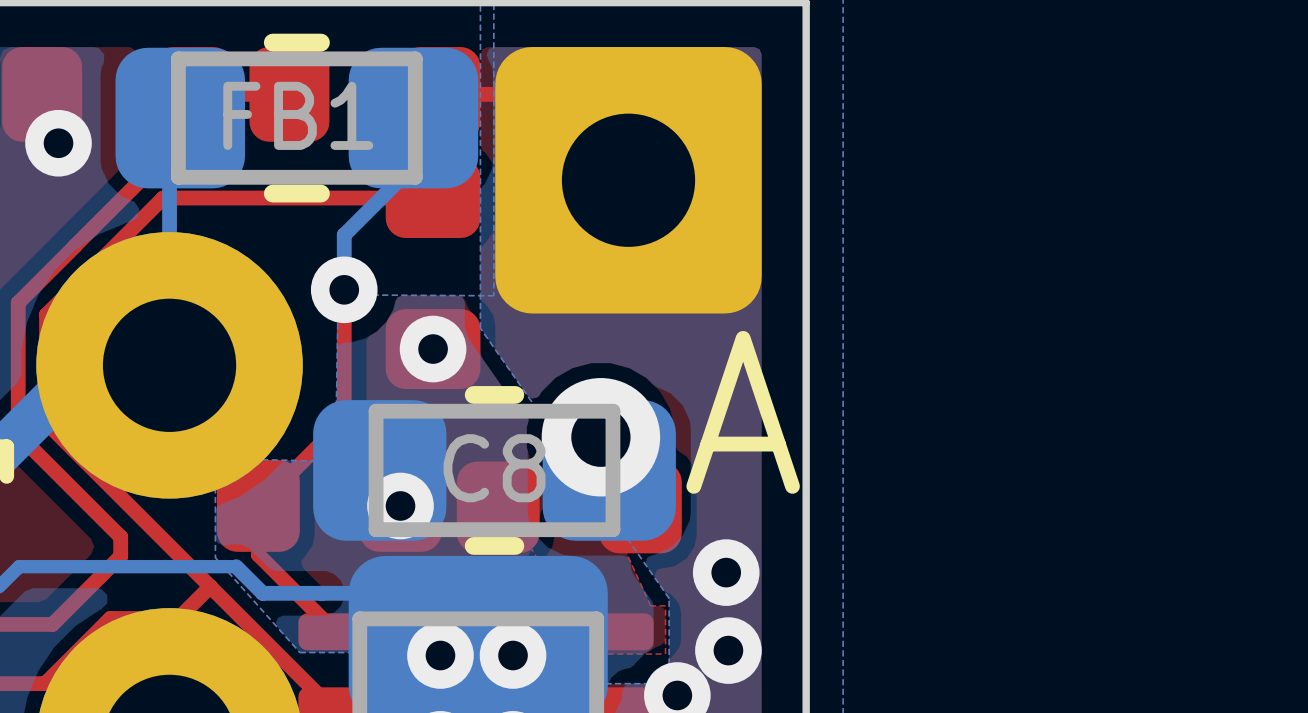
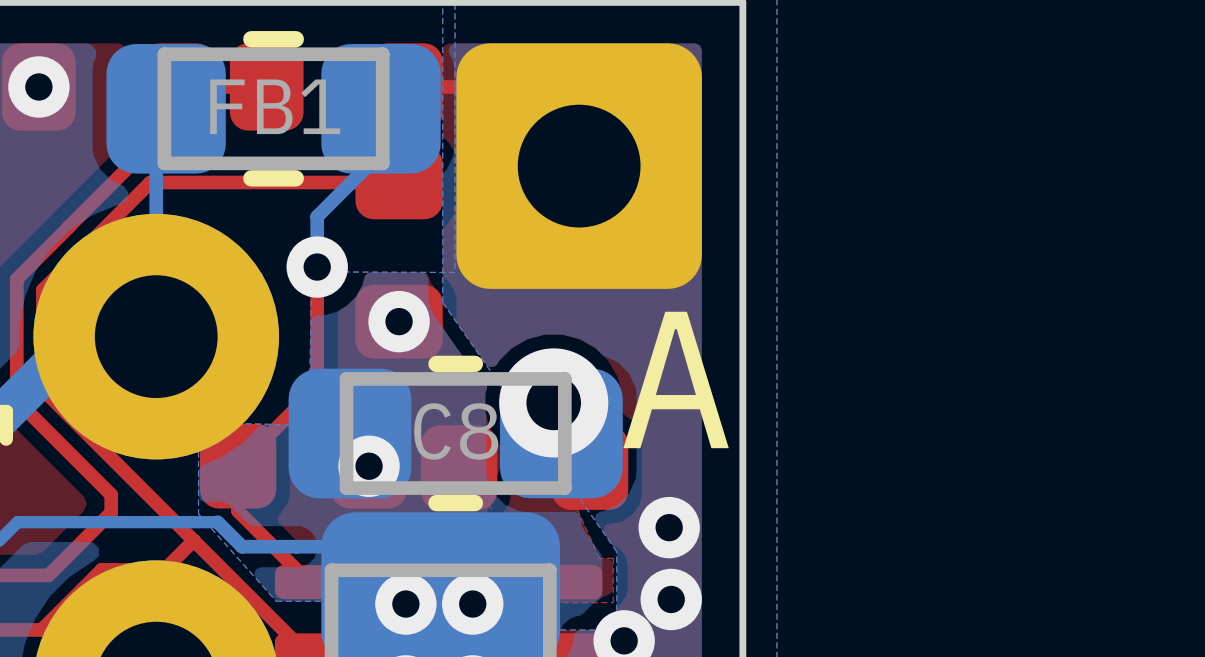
via position: (58, 143) -> (38, 86)

